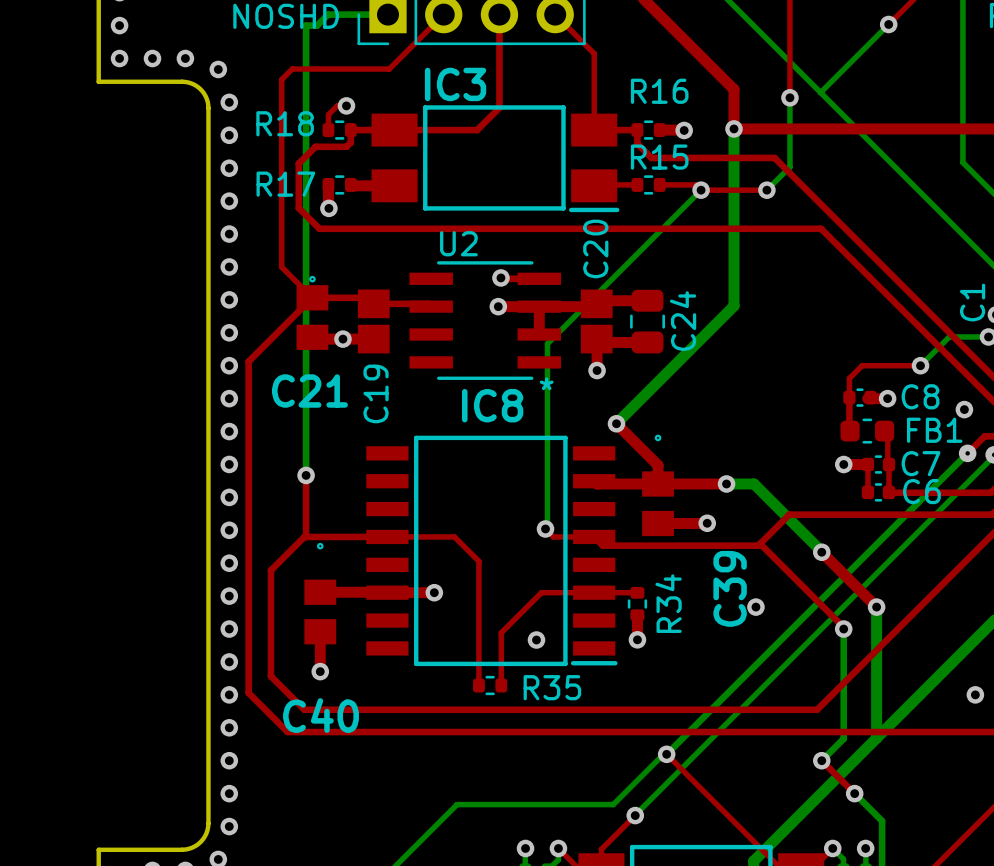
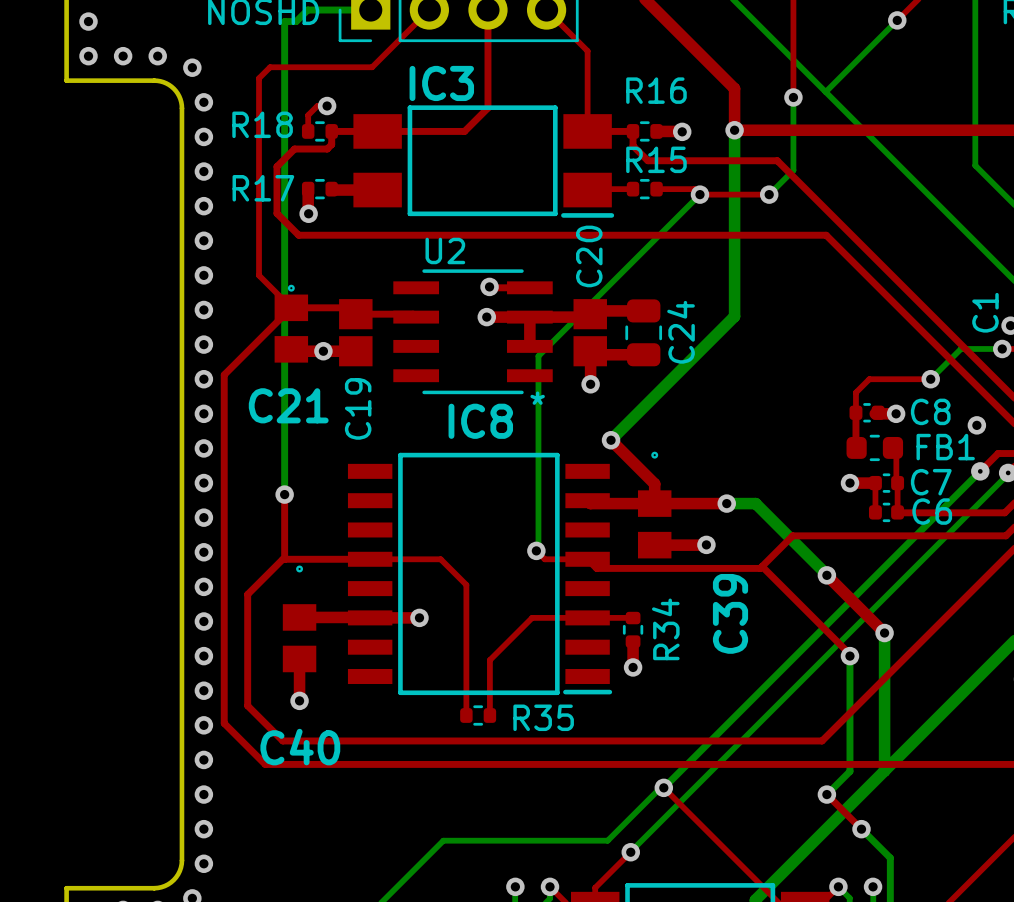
via: (755, 607) -> none
via: (536, 640) -> none
via: (975, 694) -> none

